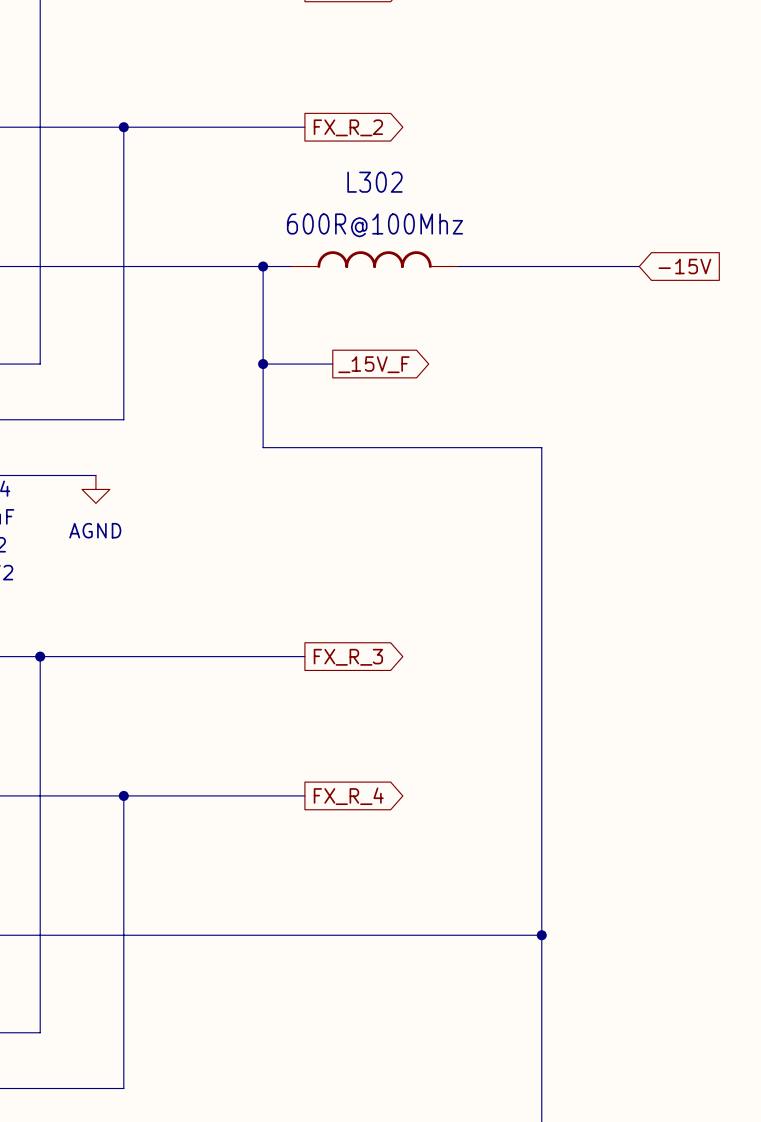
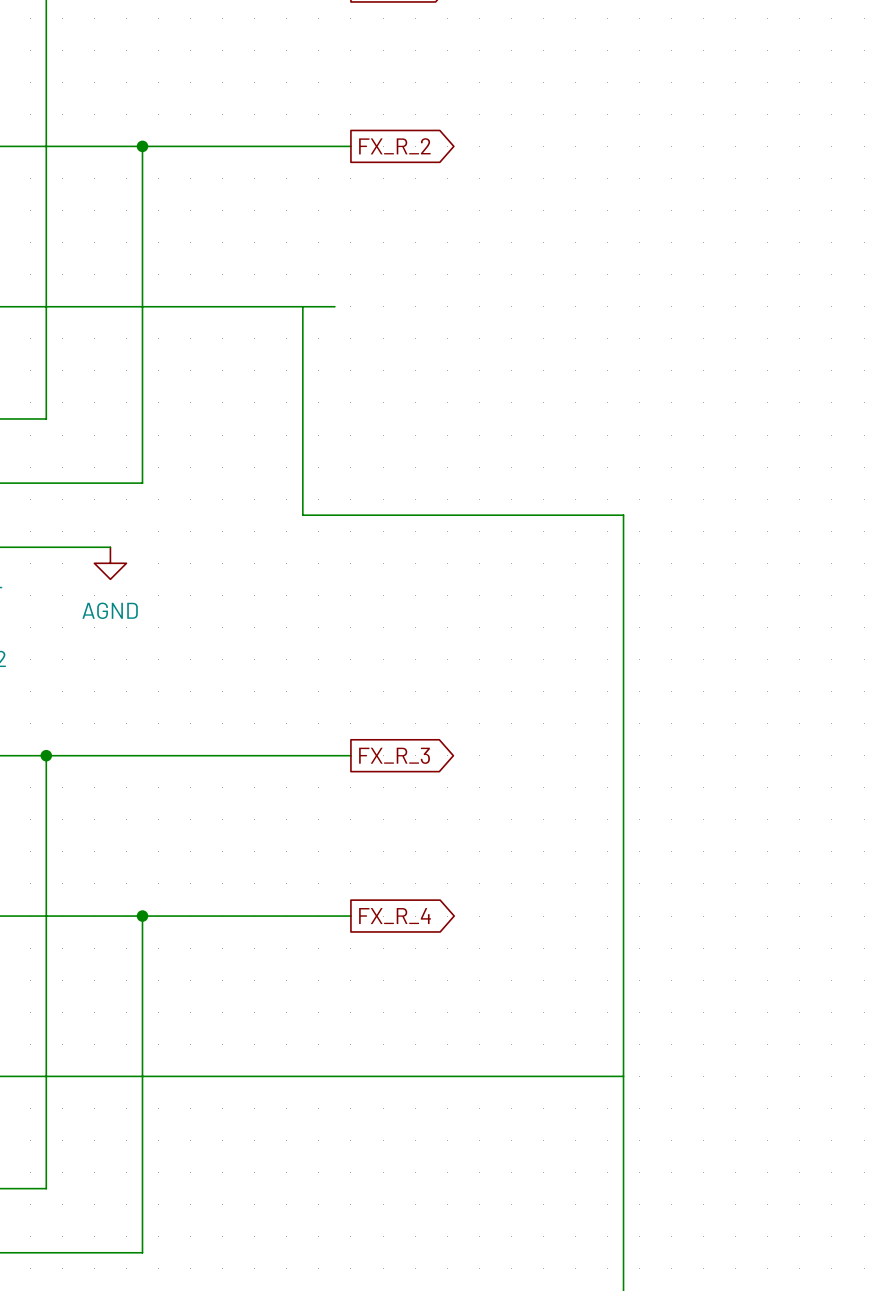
L302: 600R@100Mhz (374, 259) -> none
junction: (263, 266) -> none
wire: (458, 266) (639, 266) -> none
global label: -15V (684, 266) -> none
wire: (263, 364) (332, 364) -> none
junction: (263, 364) -> none
global label: _15V_F (373, 364) -> none
junction: (541, 935) -> none

